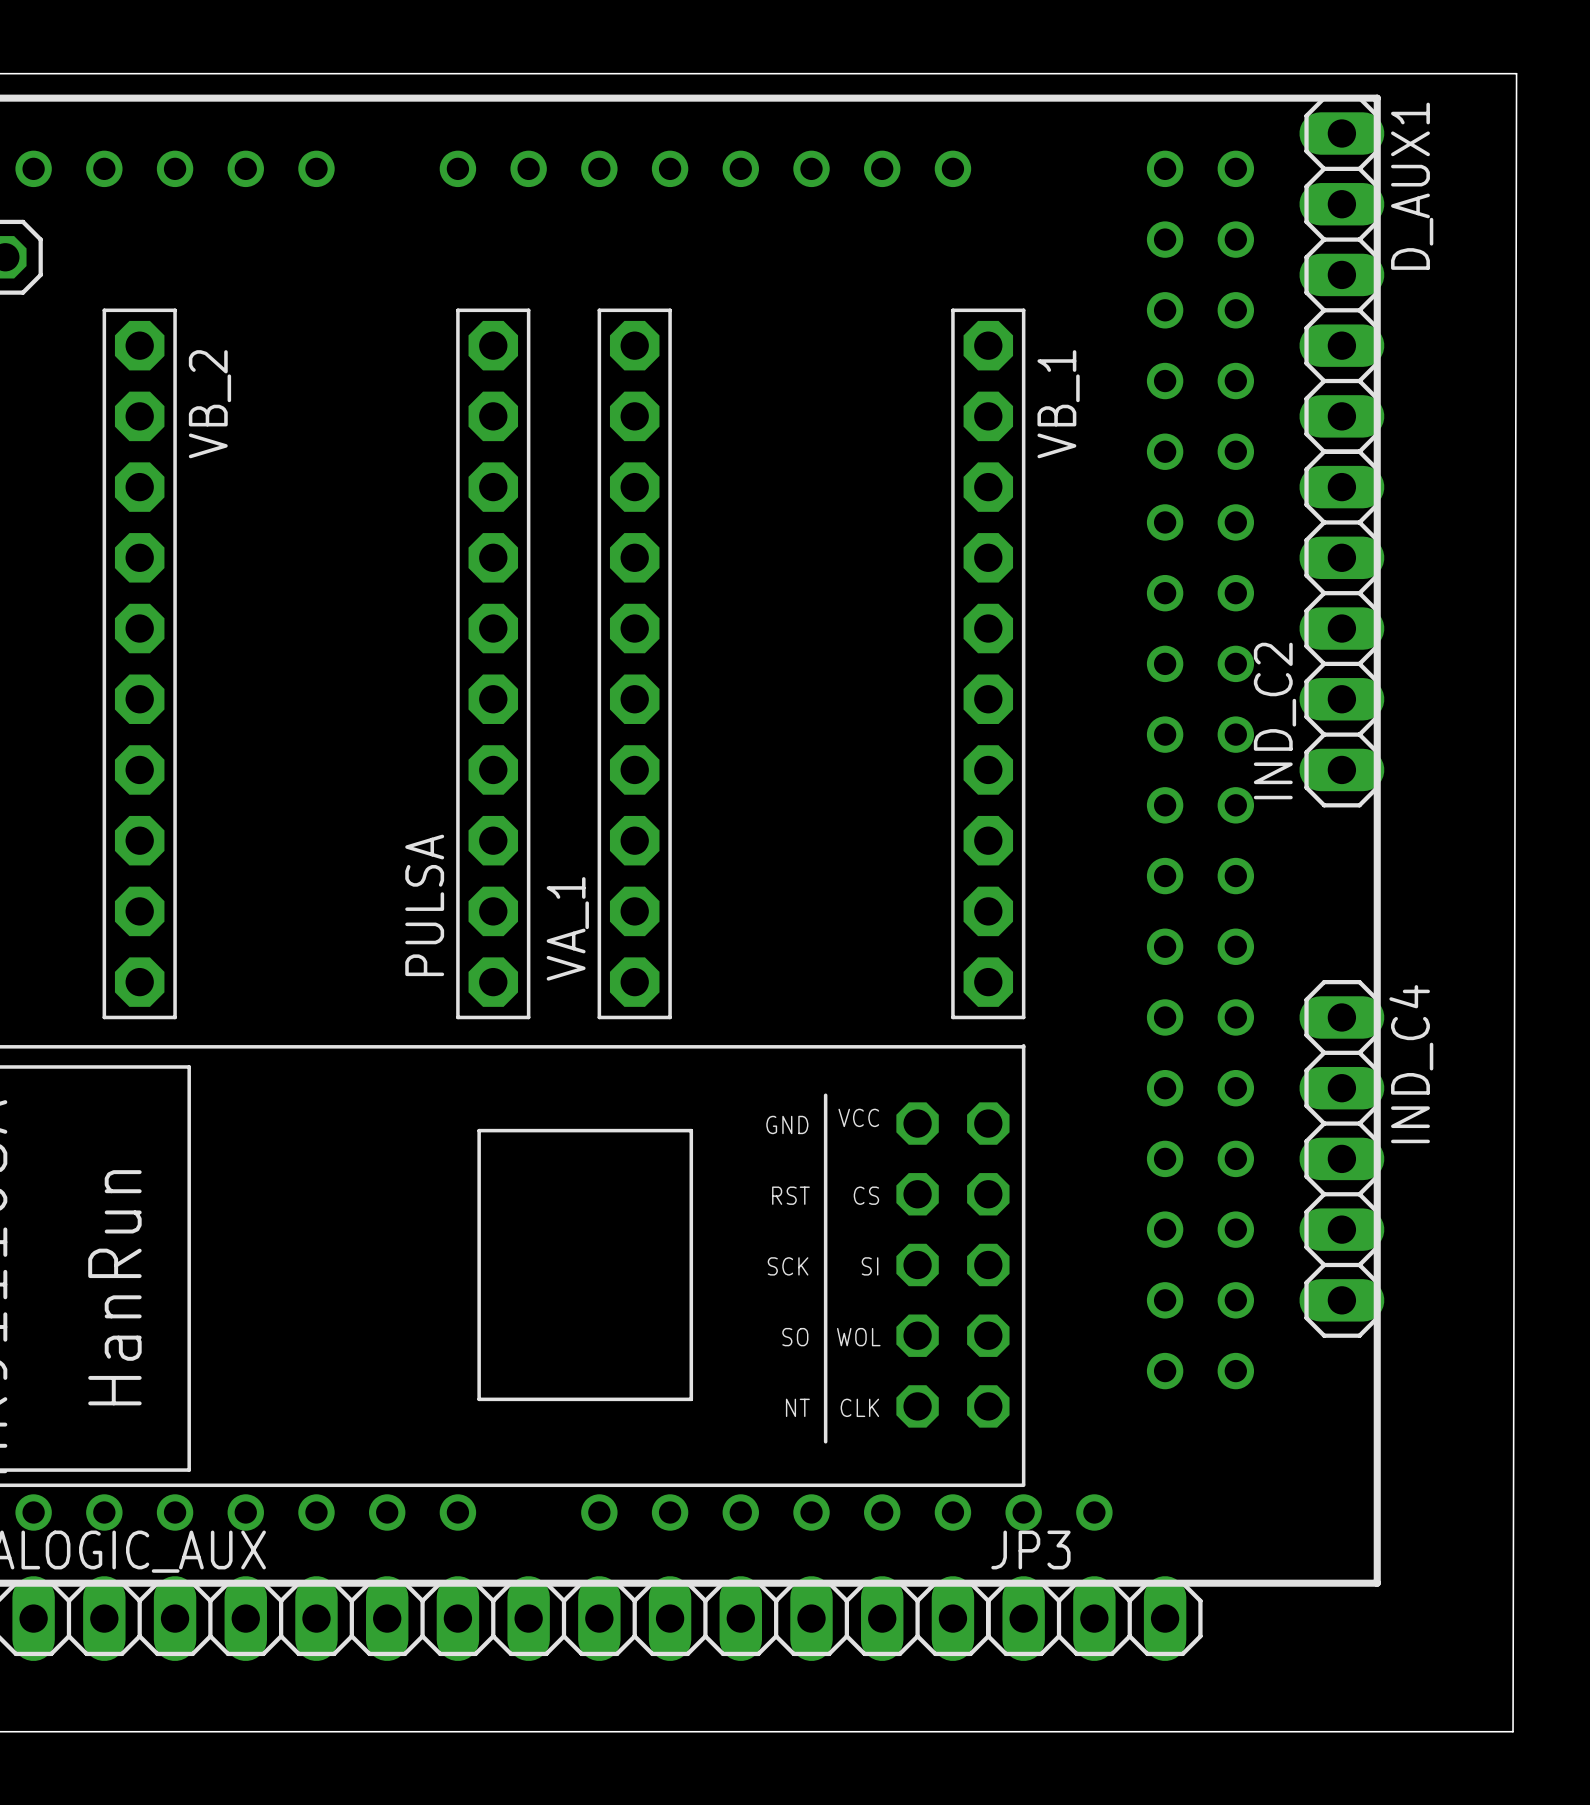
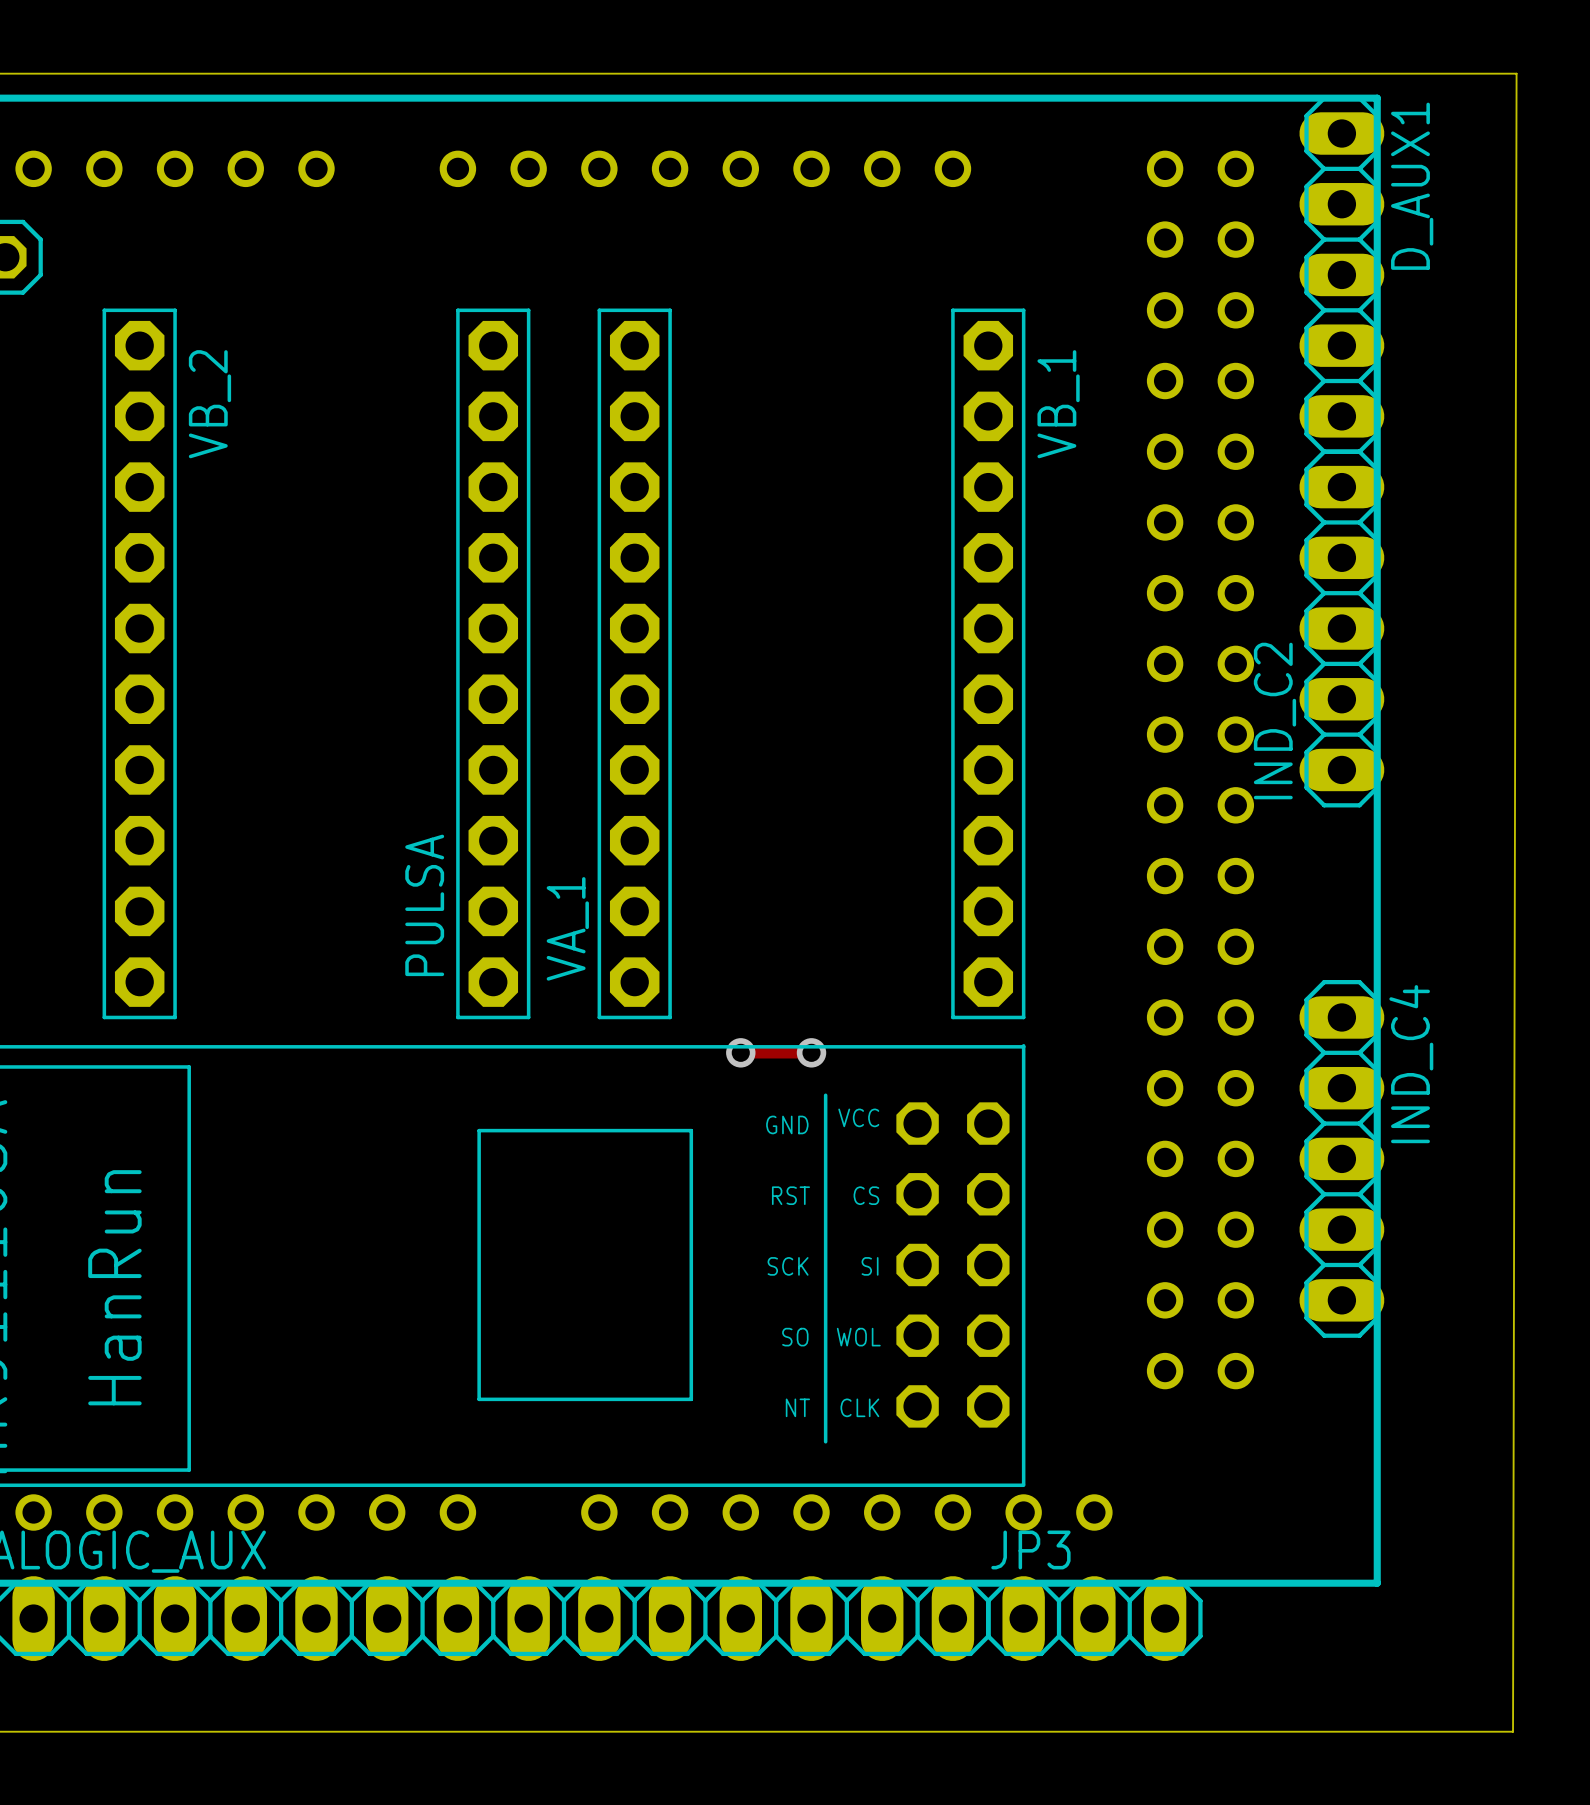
track: none -> (740, 1052) (811, 1052)
via: none -> (740, 1052)
via: none -> (811, 1052)

